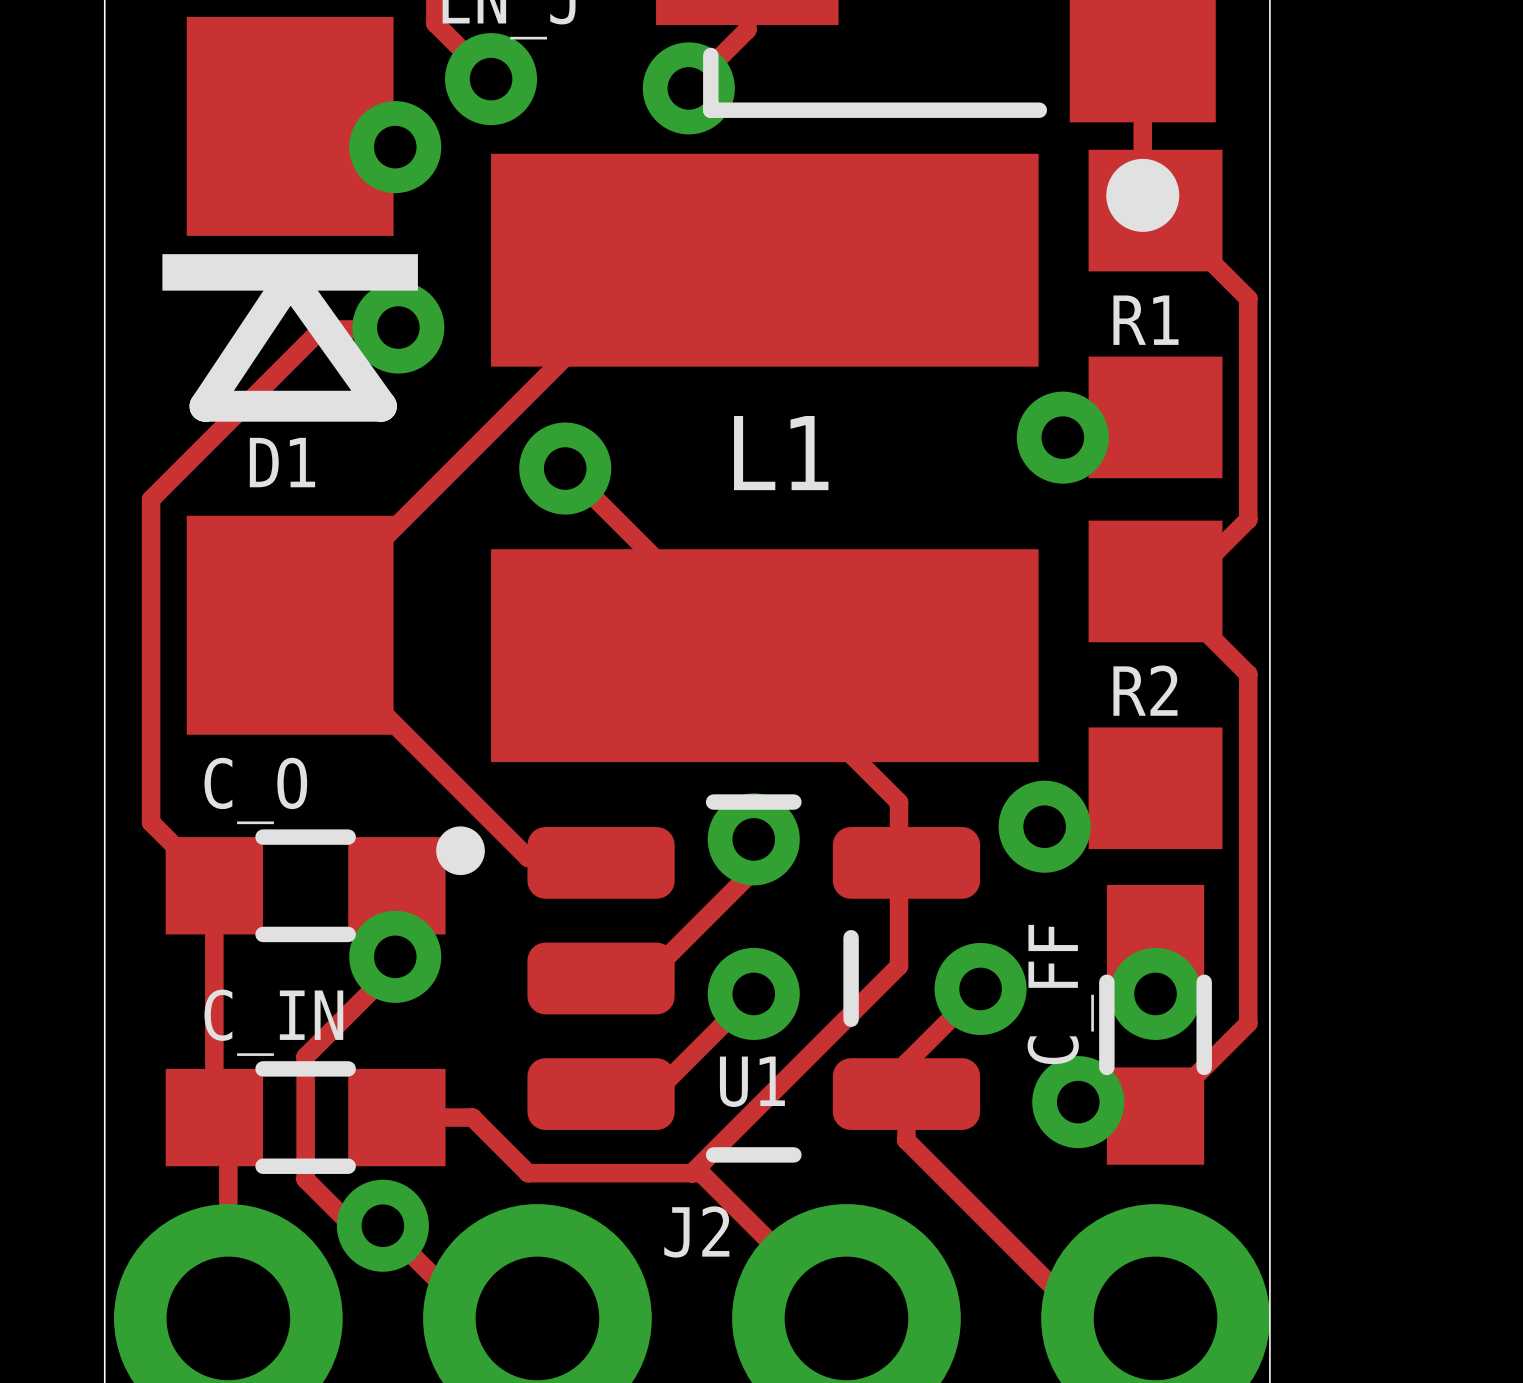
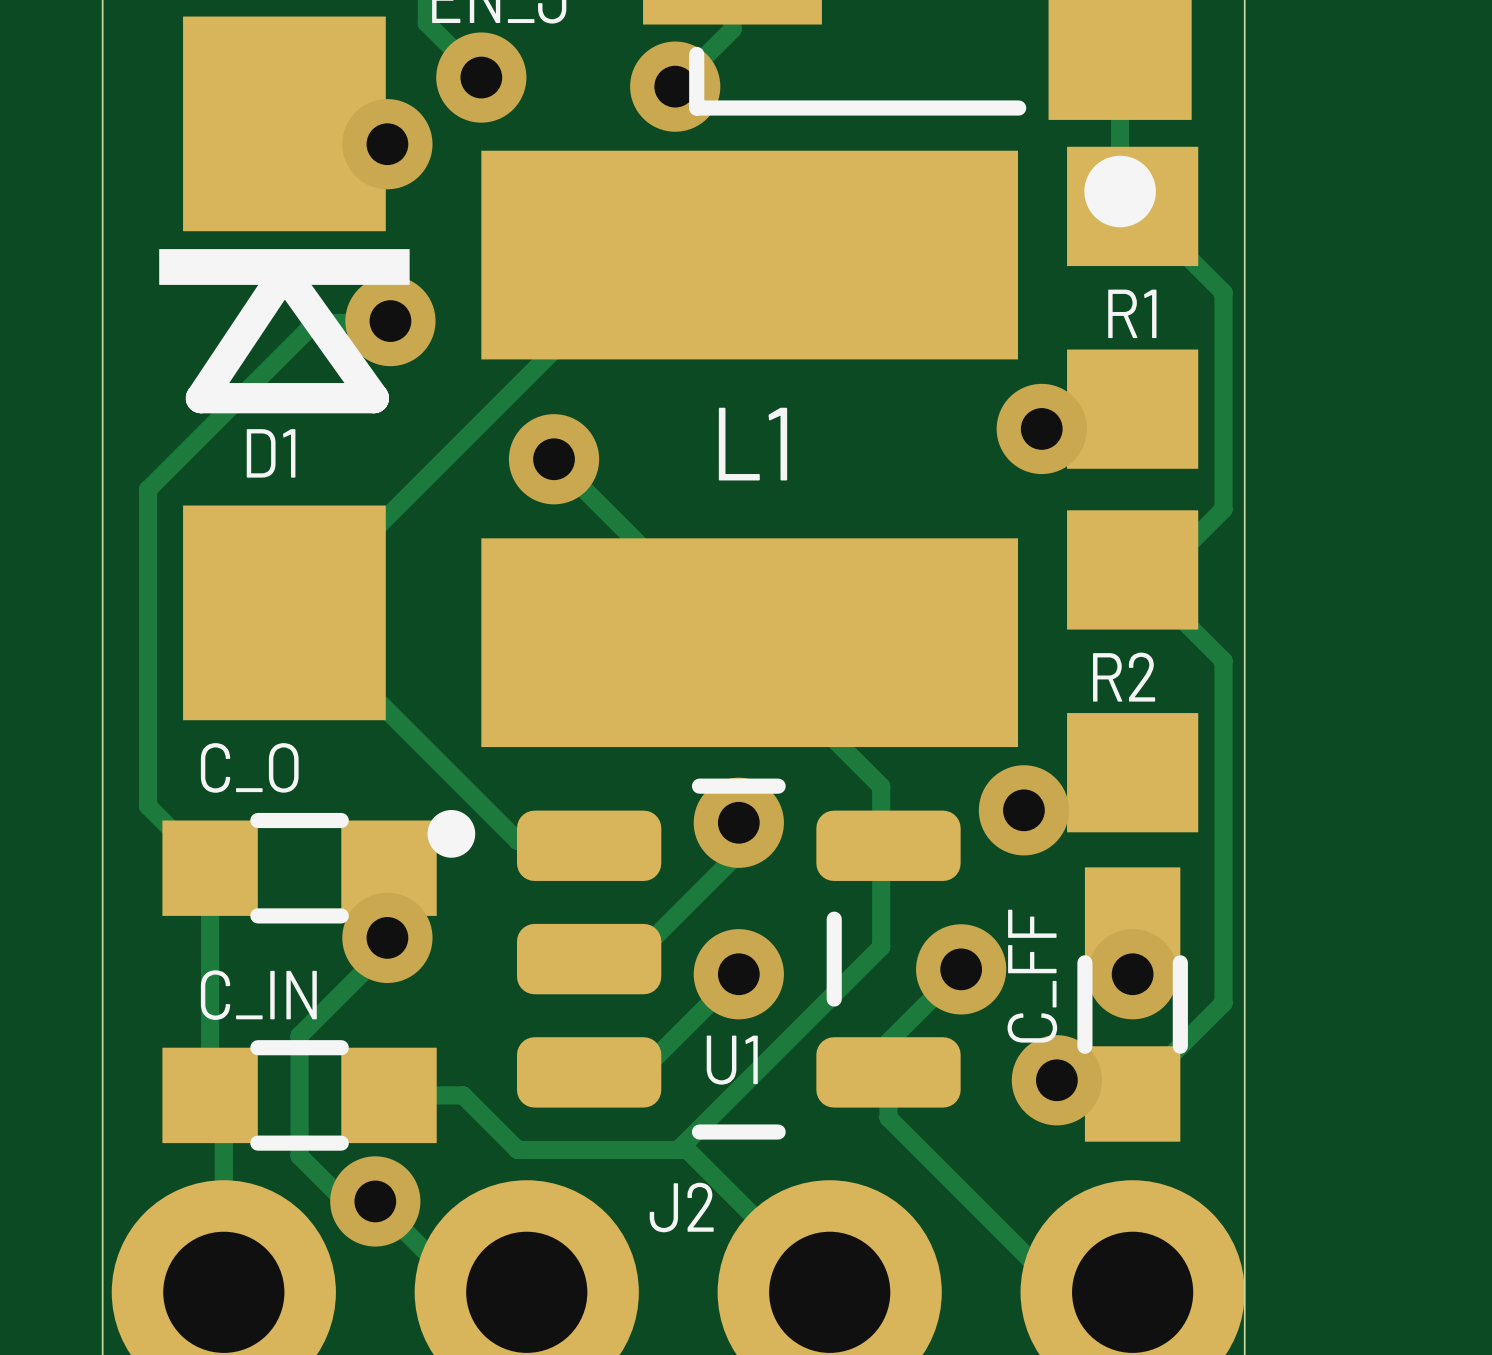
R1 name position: R1 (1145, 320) -> R1 (1132, 313)

